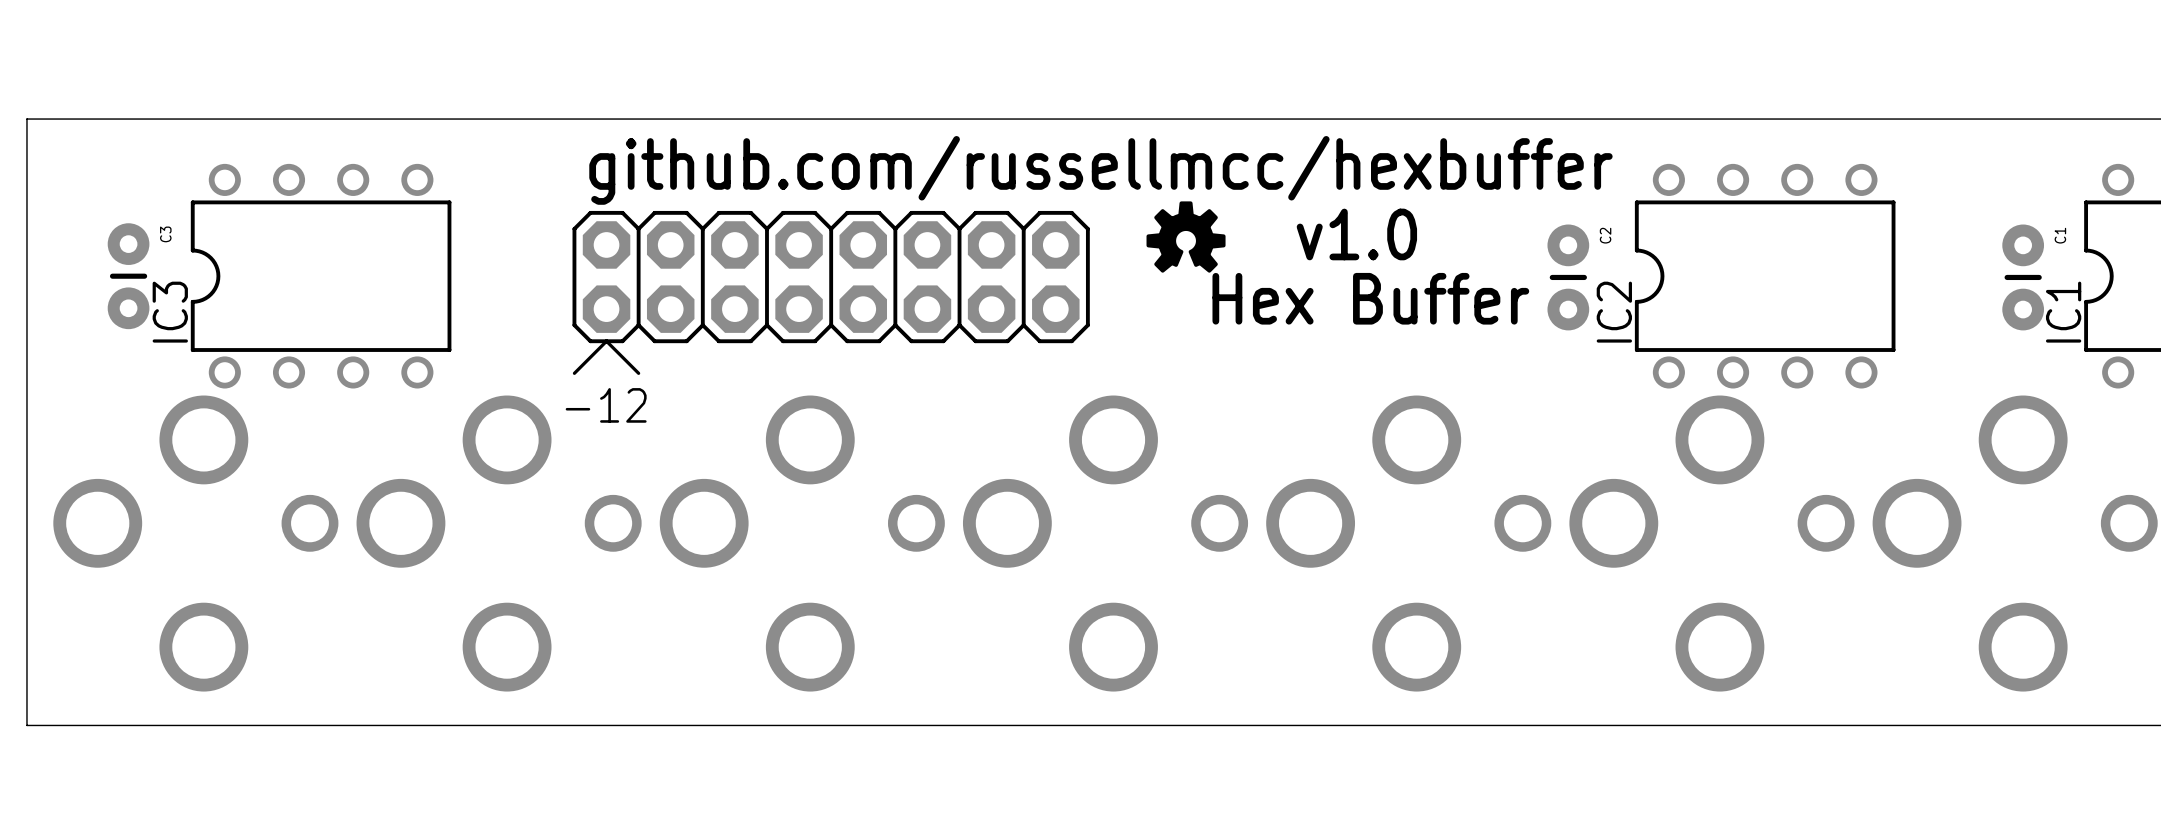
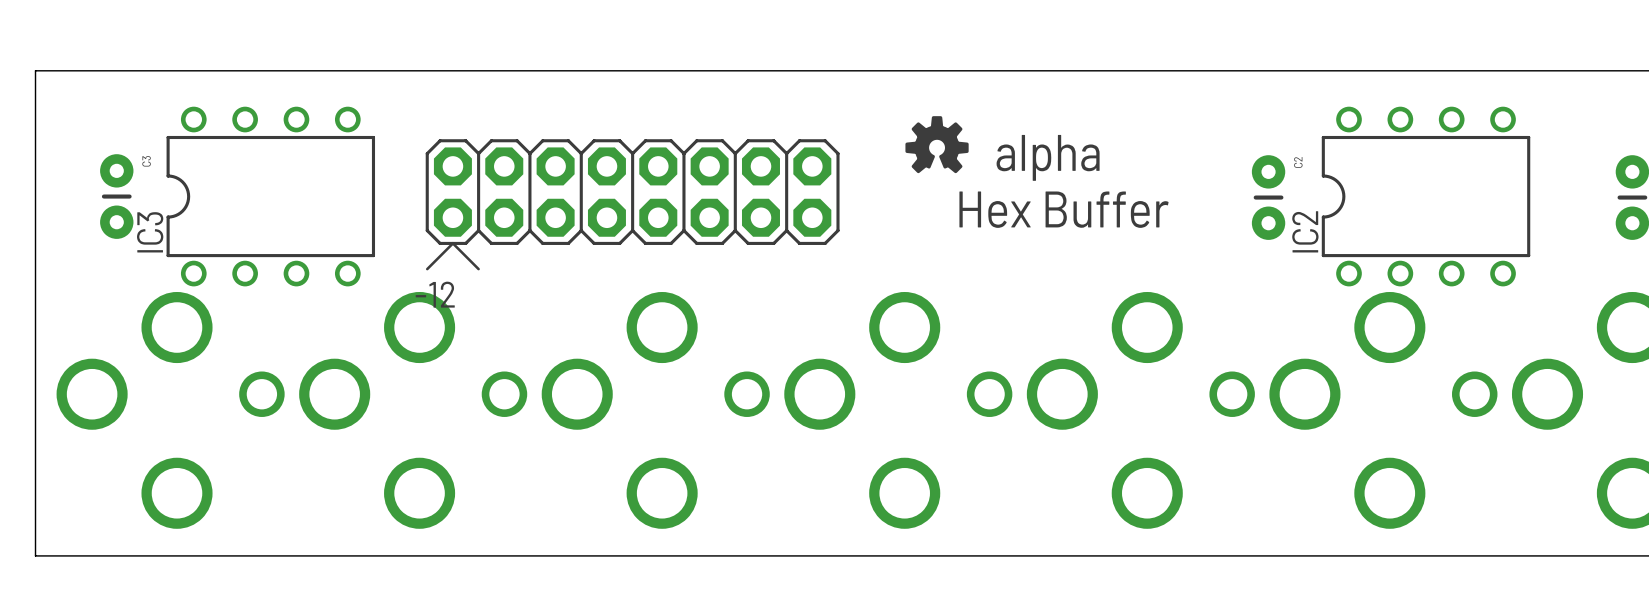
text: github.com/russellmcc/hexbuffer (1100, 170) -> none
text: none -> alpha (1048, 157)
text: v1.0 (1356, 234) -> none
drawing position: (1186, 237) -> (937, 144)
part position: (831, 292) -> (632, 204)
text position: Hex Buffer (1370, 298) -> Hex Buffer (1064, 209)

